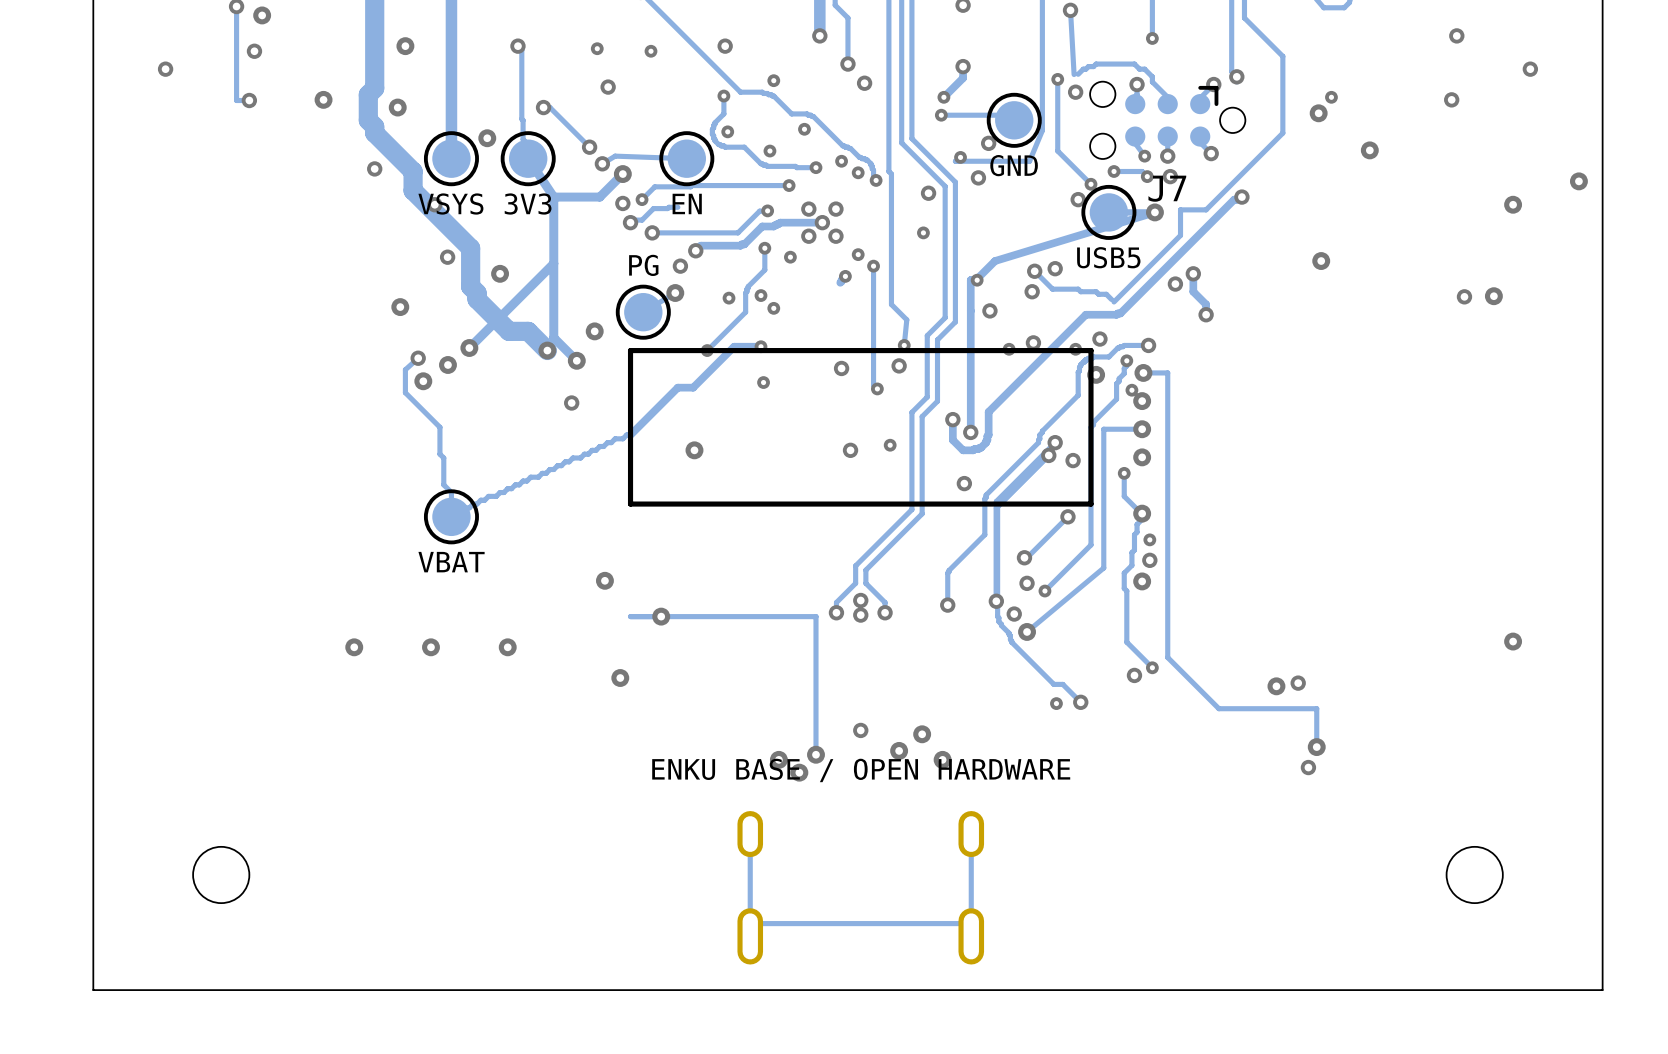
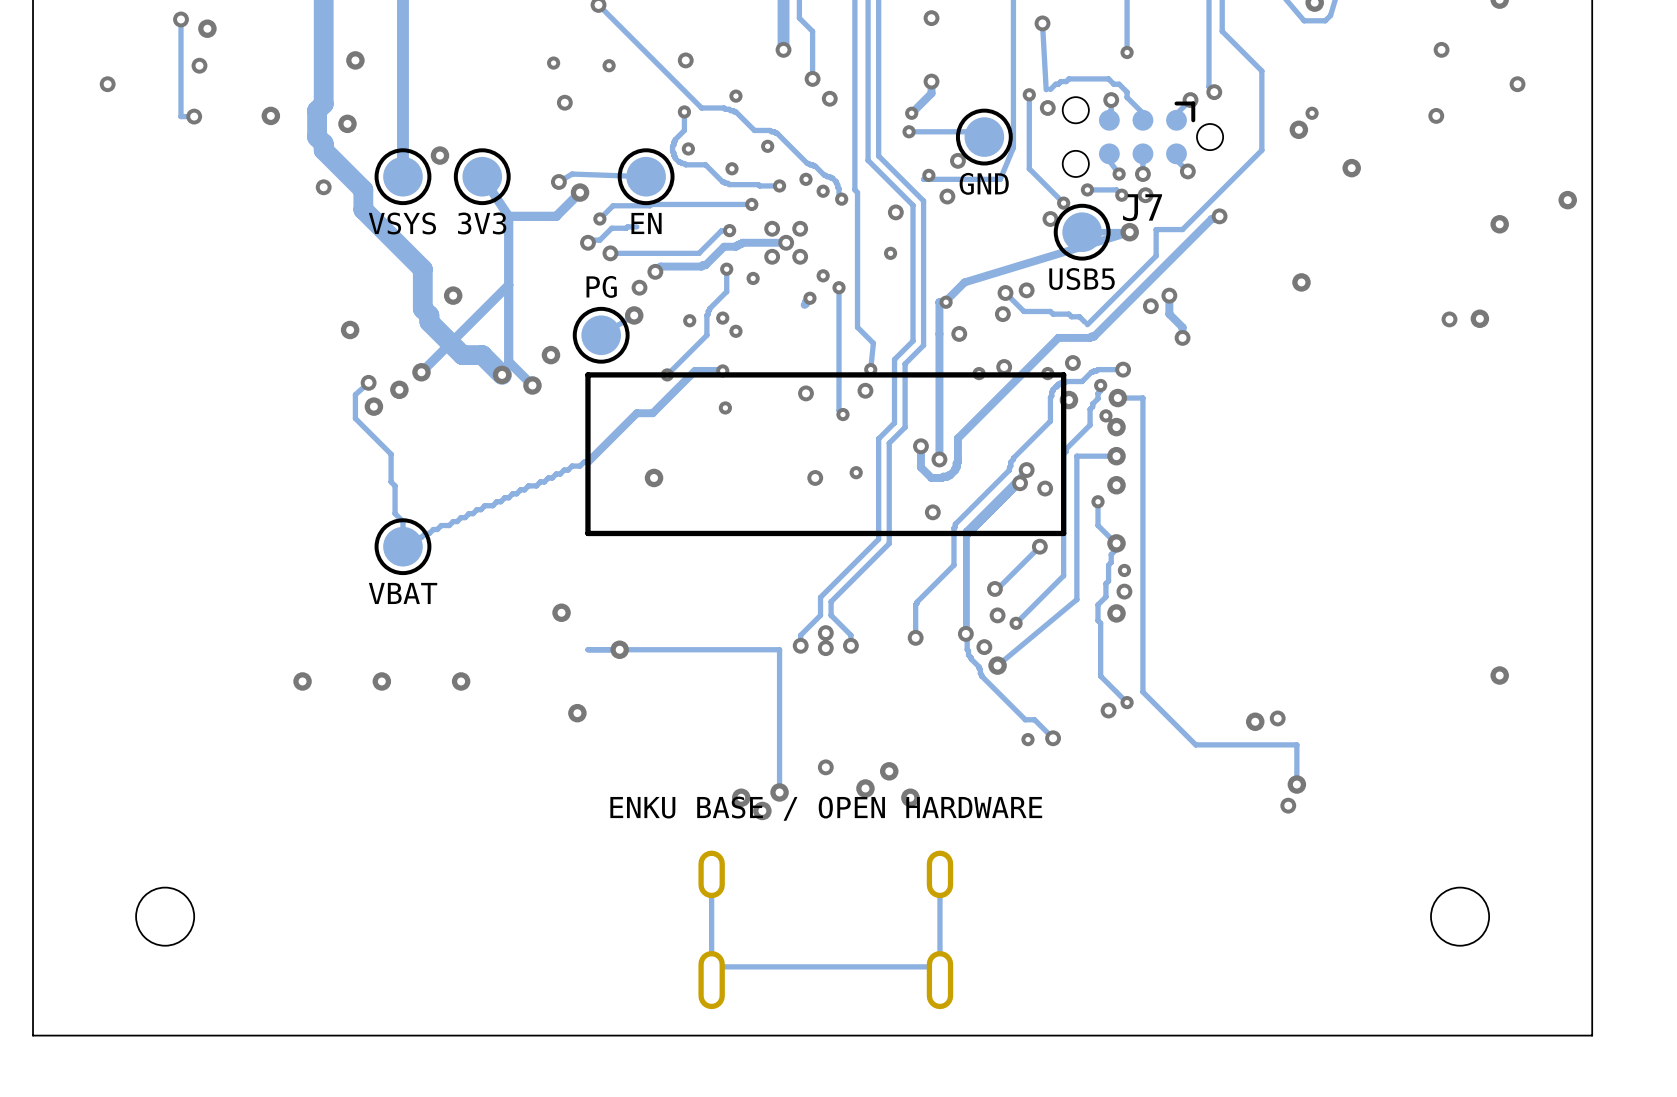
track: (517, 46) (521, 49) (521, 119) (524, 148) (528, 158) -> none
via: (517, 46) -> none
track: (543, 107) (549, 107) (589, 147) -> none
via: (543, 107) -> none
via: (589, 147) -> none
via: (622, 203) -> none
via: (434, 204) -> none
via: (447, 257) -> none
via: (571, 403) -> none

